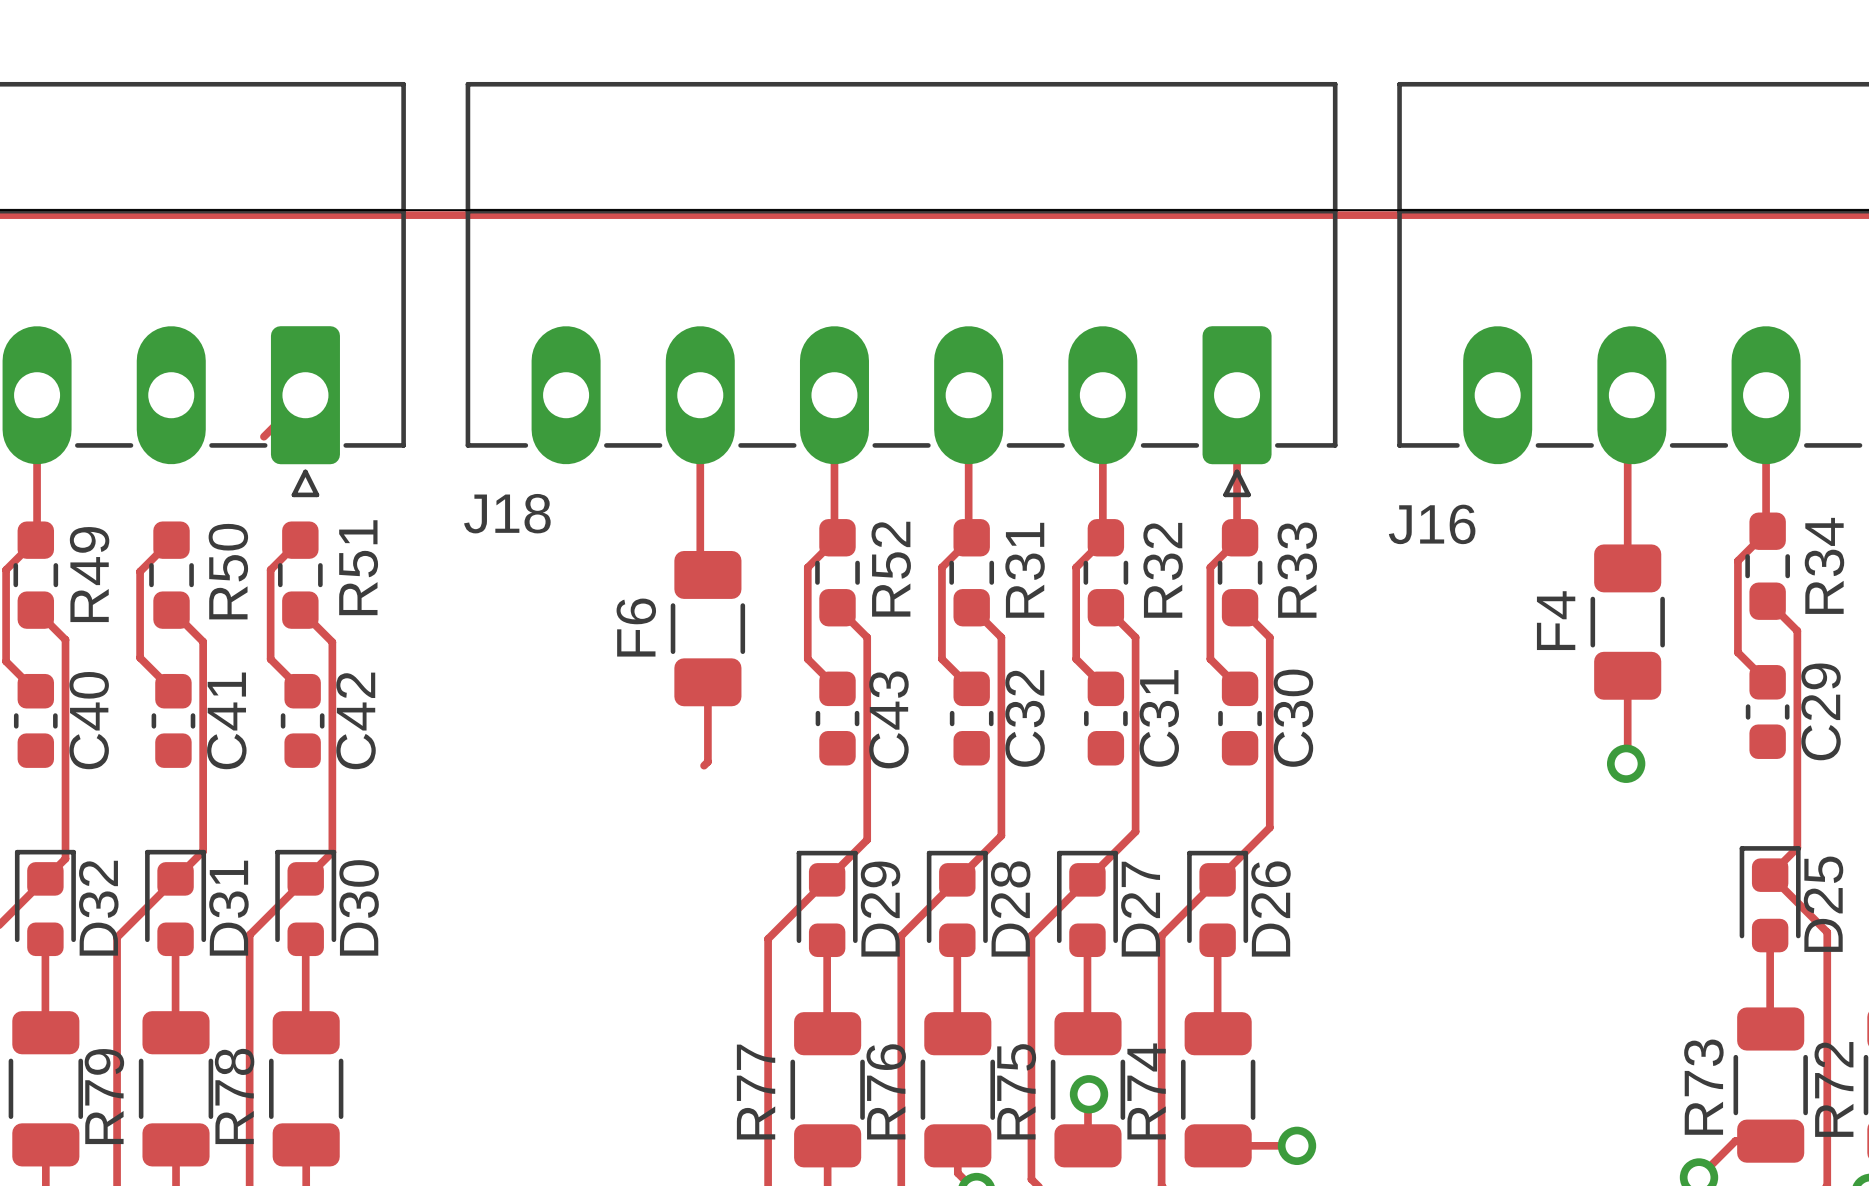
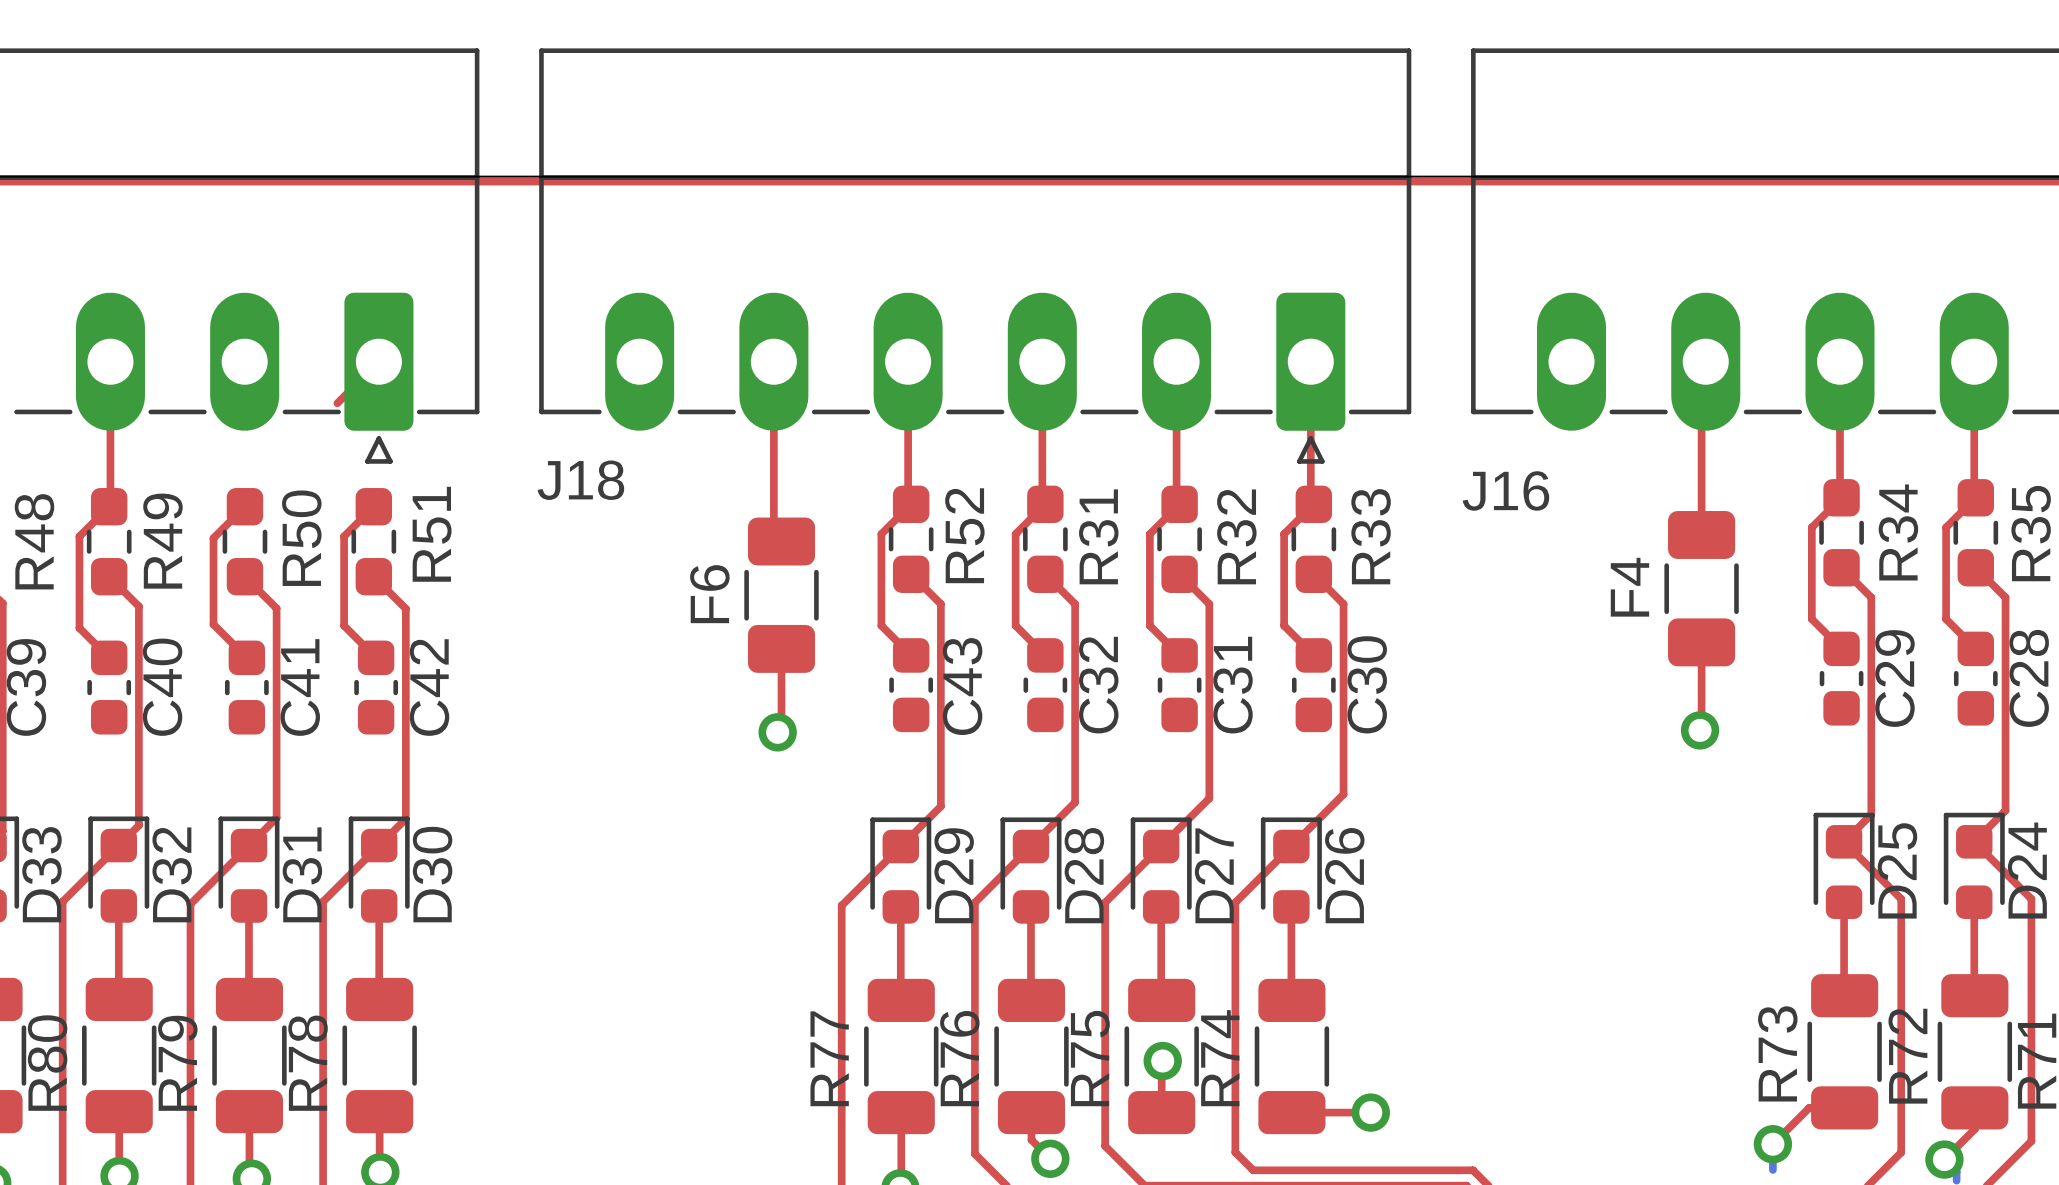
via: none -> (777, 732)

